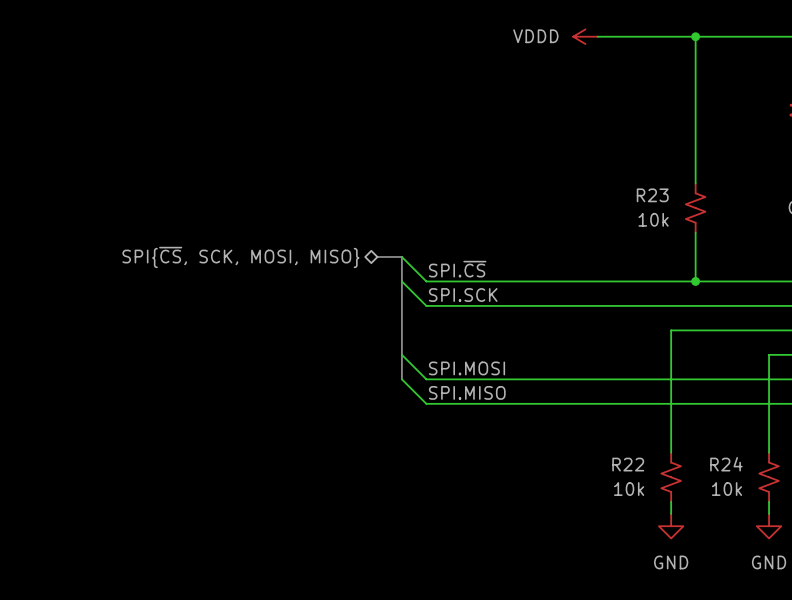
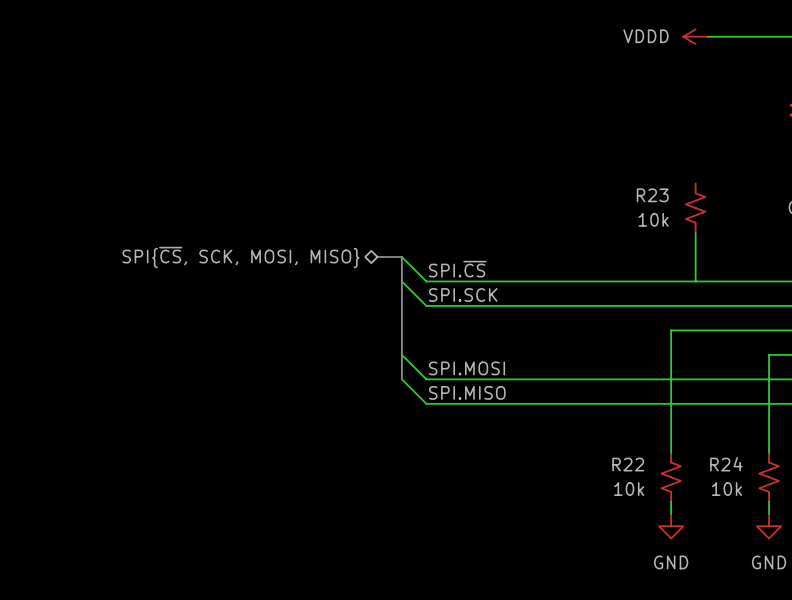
power symbol position: VDDD (585, 36) -> VDDD (695, 36)
wire: (597, 36) (707, 36) -> none
wire: (695, 36) (695, 183) -> none
junction: (695, 36) -> none
junction: (695, 281) -> none

